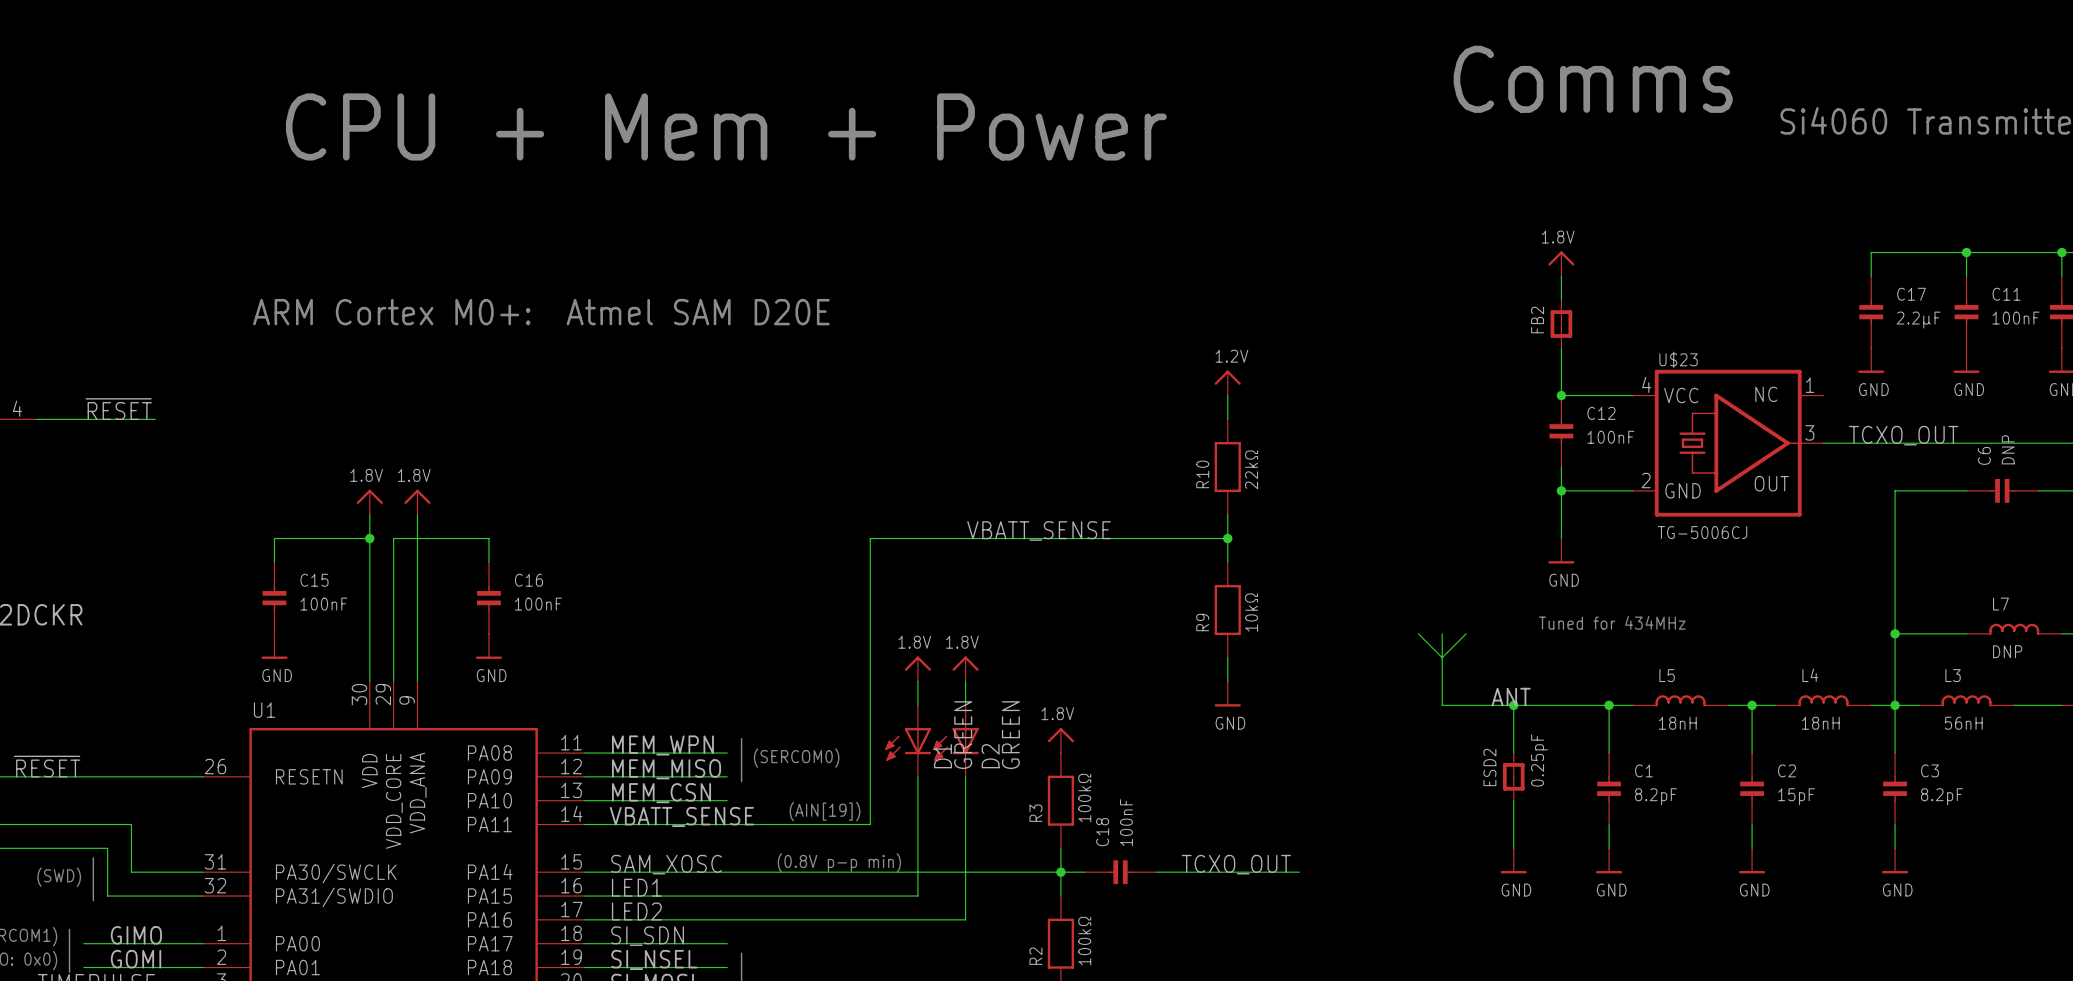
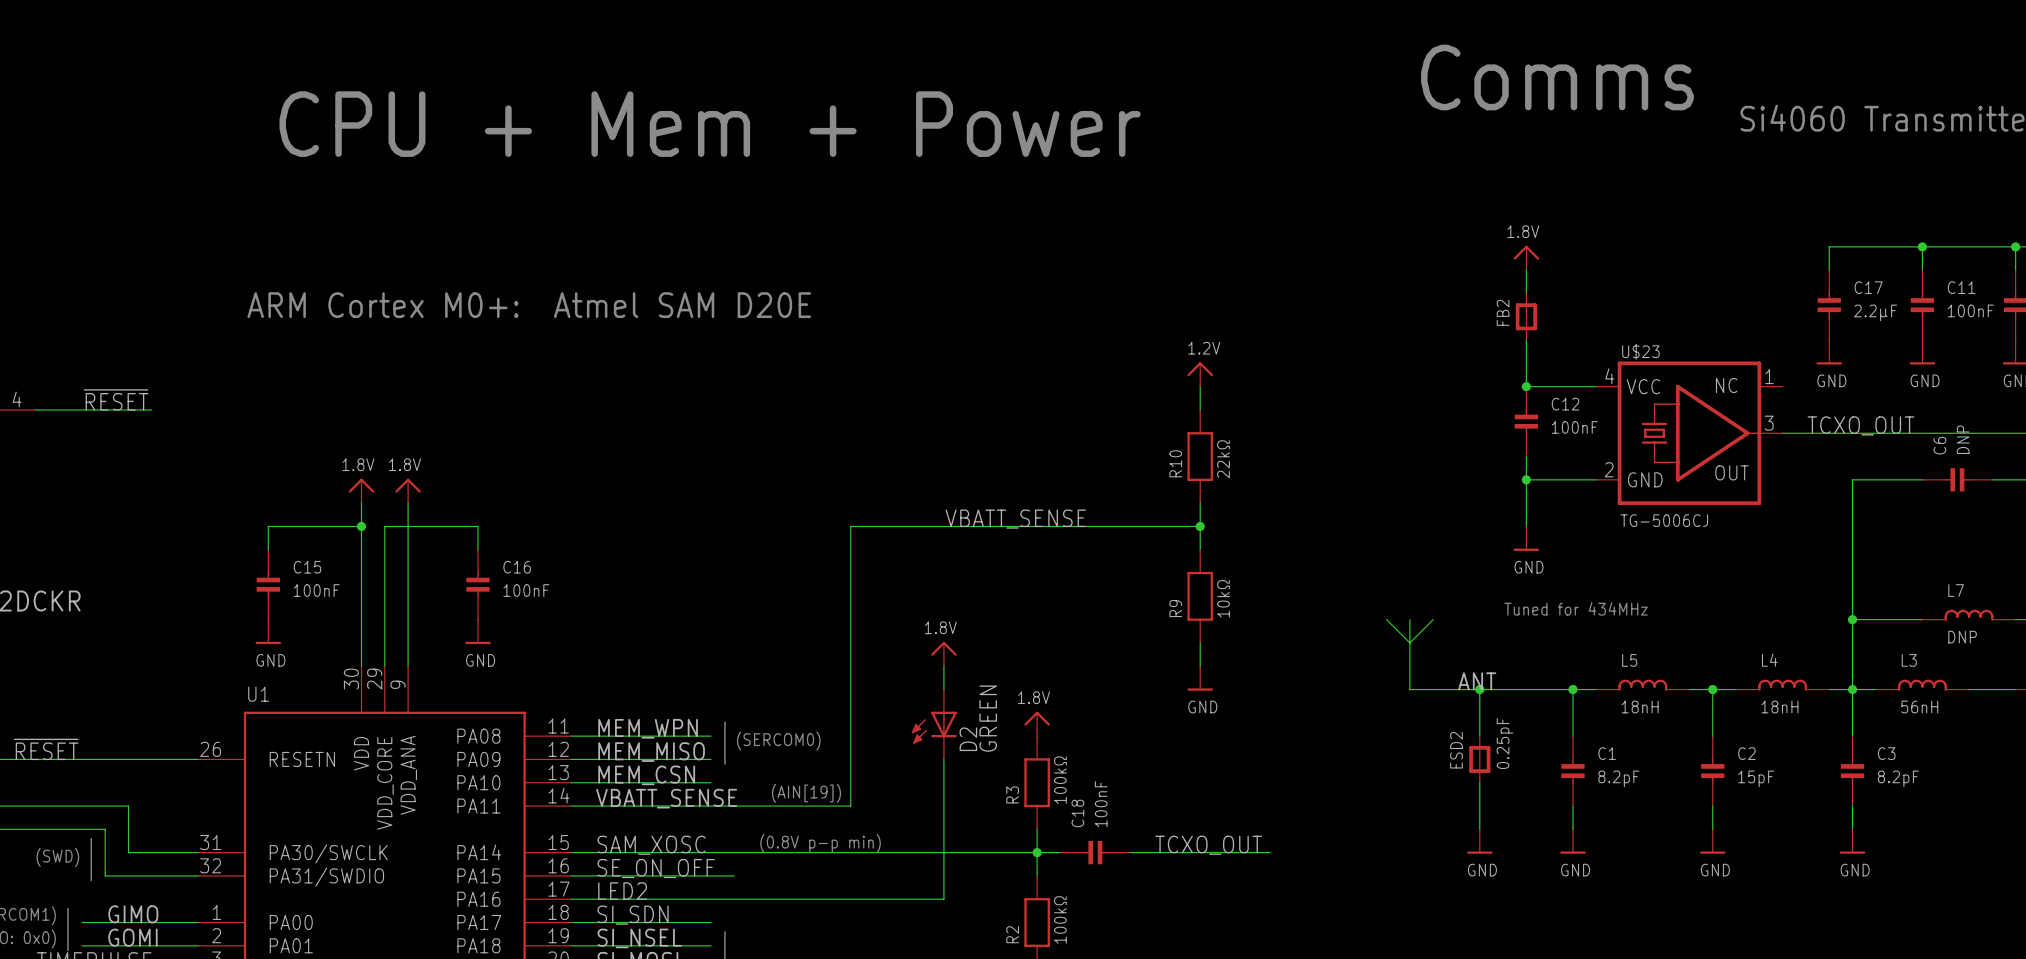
power symbol: 1.8V (917, 669) -> none
wire: (917, 681) (917, 705) -> none
D1: GREEN (908, 741) -> none
wire: (917, 776) (917, 896) (751, 896) -> none
label: LED1 (636, 887) -> SE_ON_OFF (656, 868)

